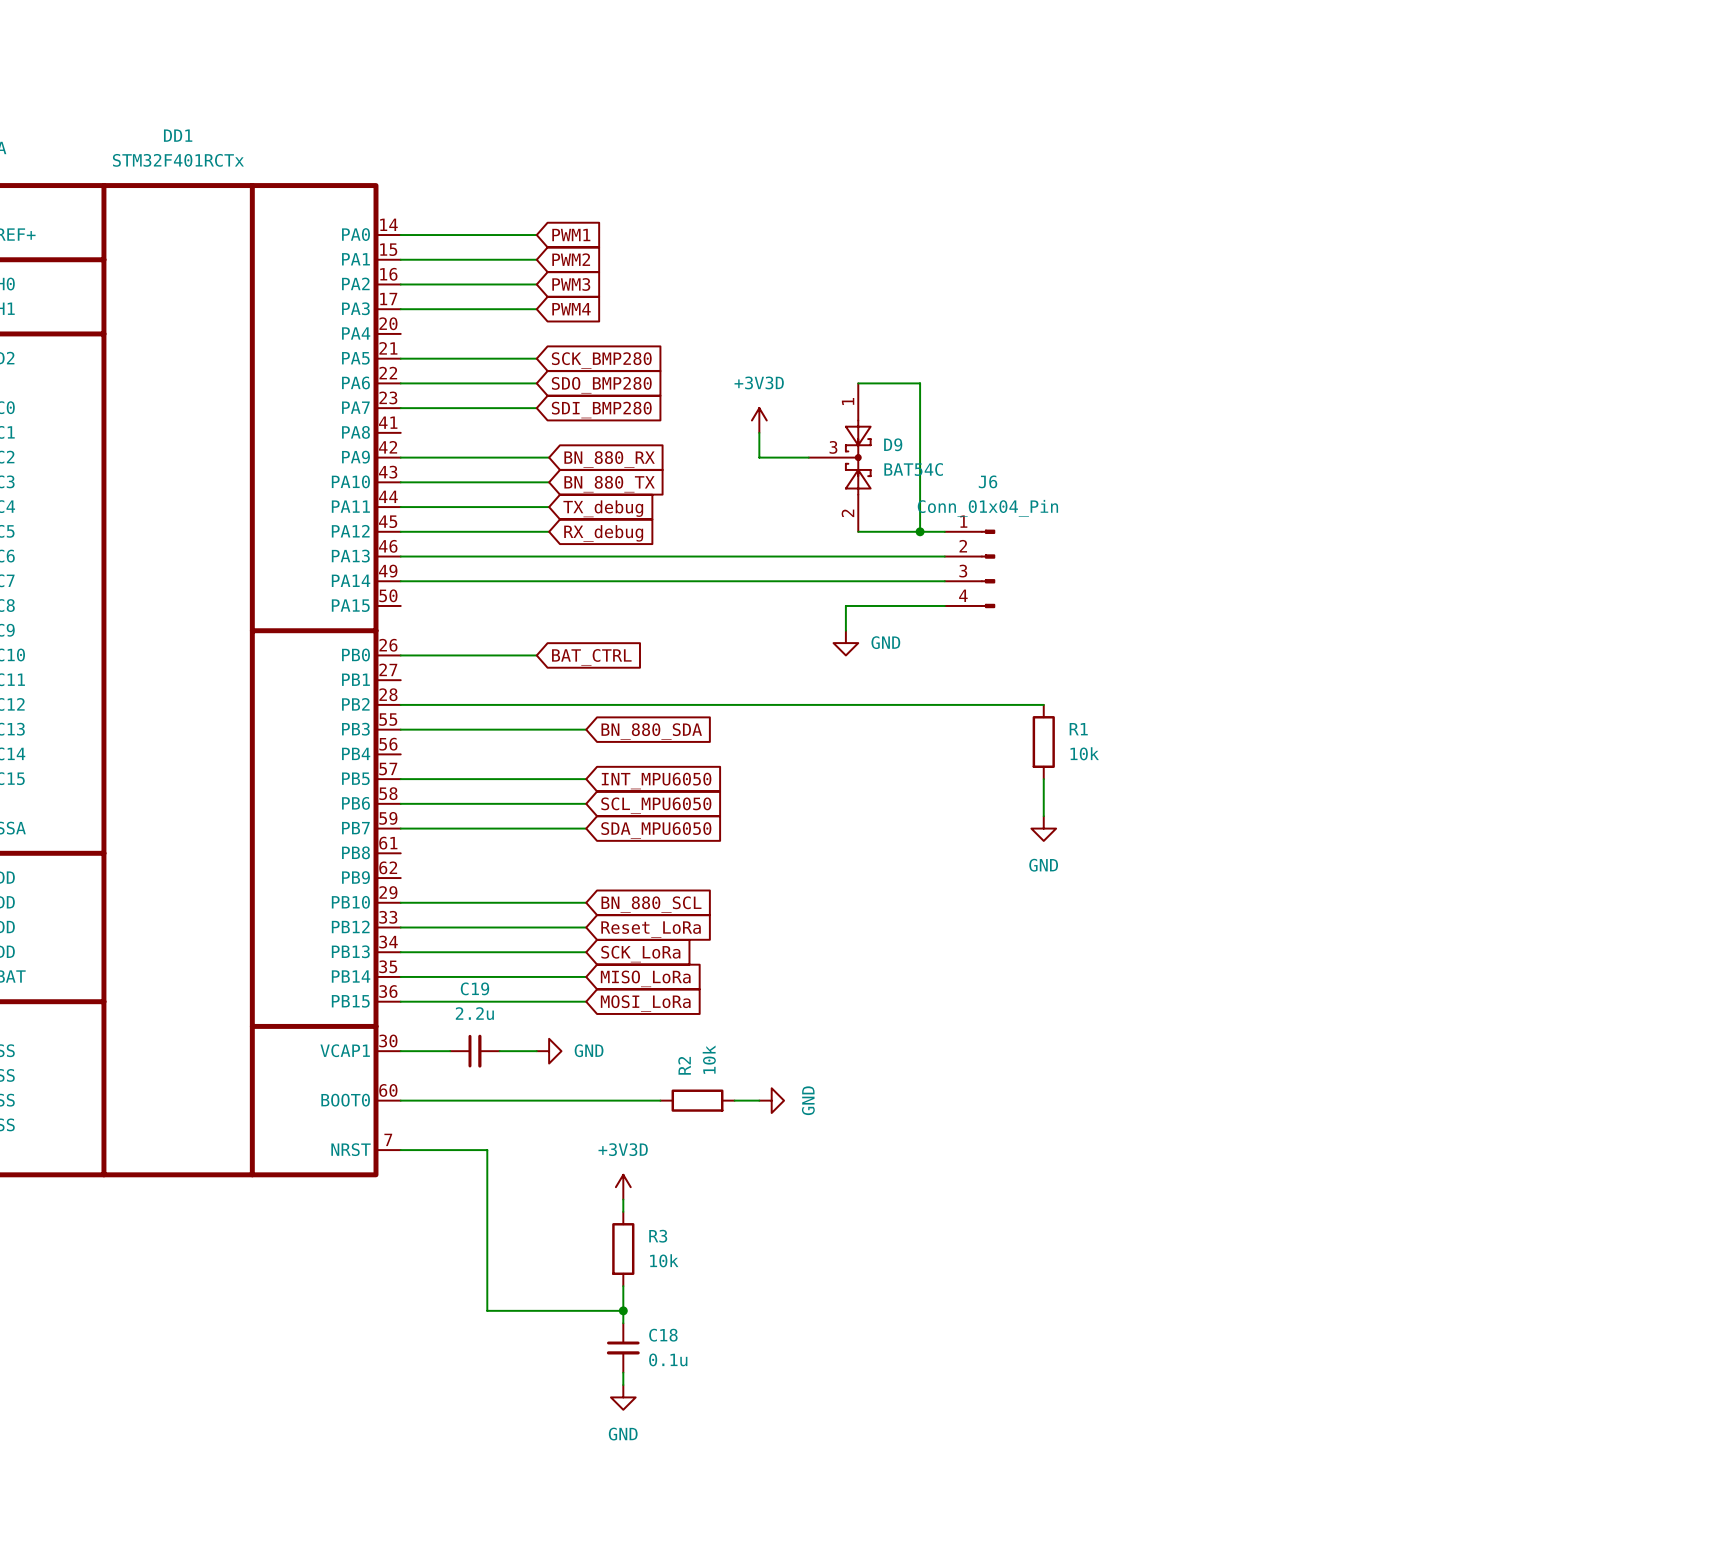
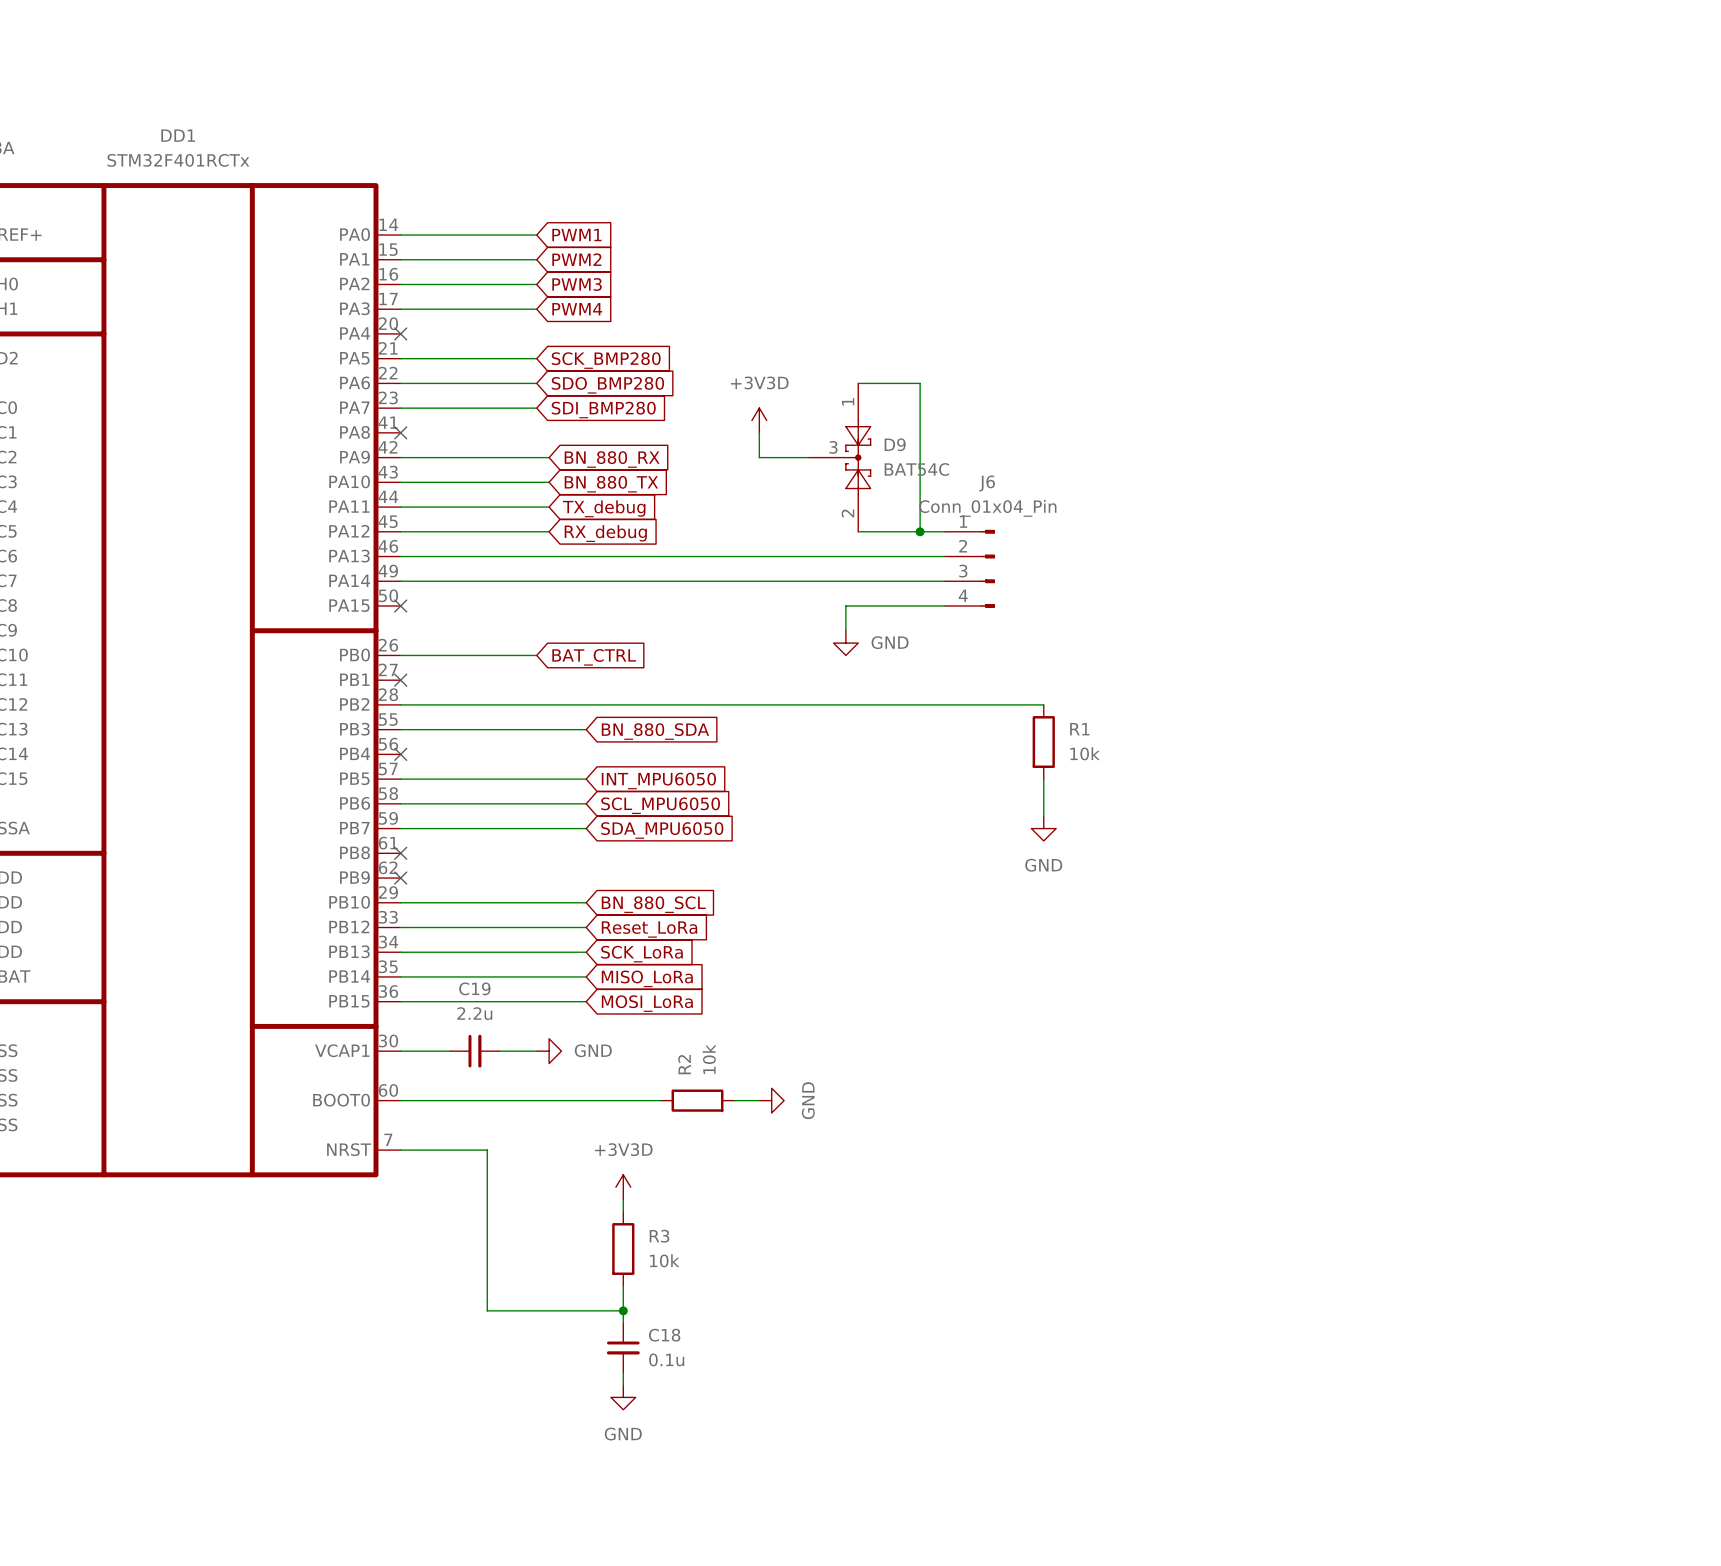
no-connect mark: none -> (400, 333)
no-connect mark: none -> (400, 432)
no-connect mark: none -> (400, 605)
no-connect mark: none -> (400, 680)
no-connect mark: none -> (400, 754)
no-connect mark: none -> (400, 853)
no-connect mark: none -> (400, 878)

